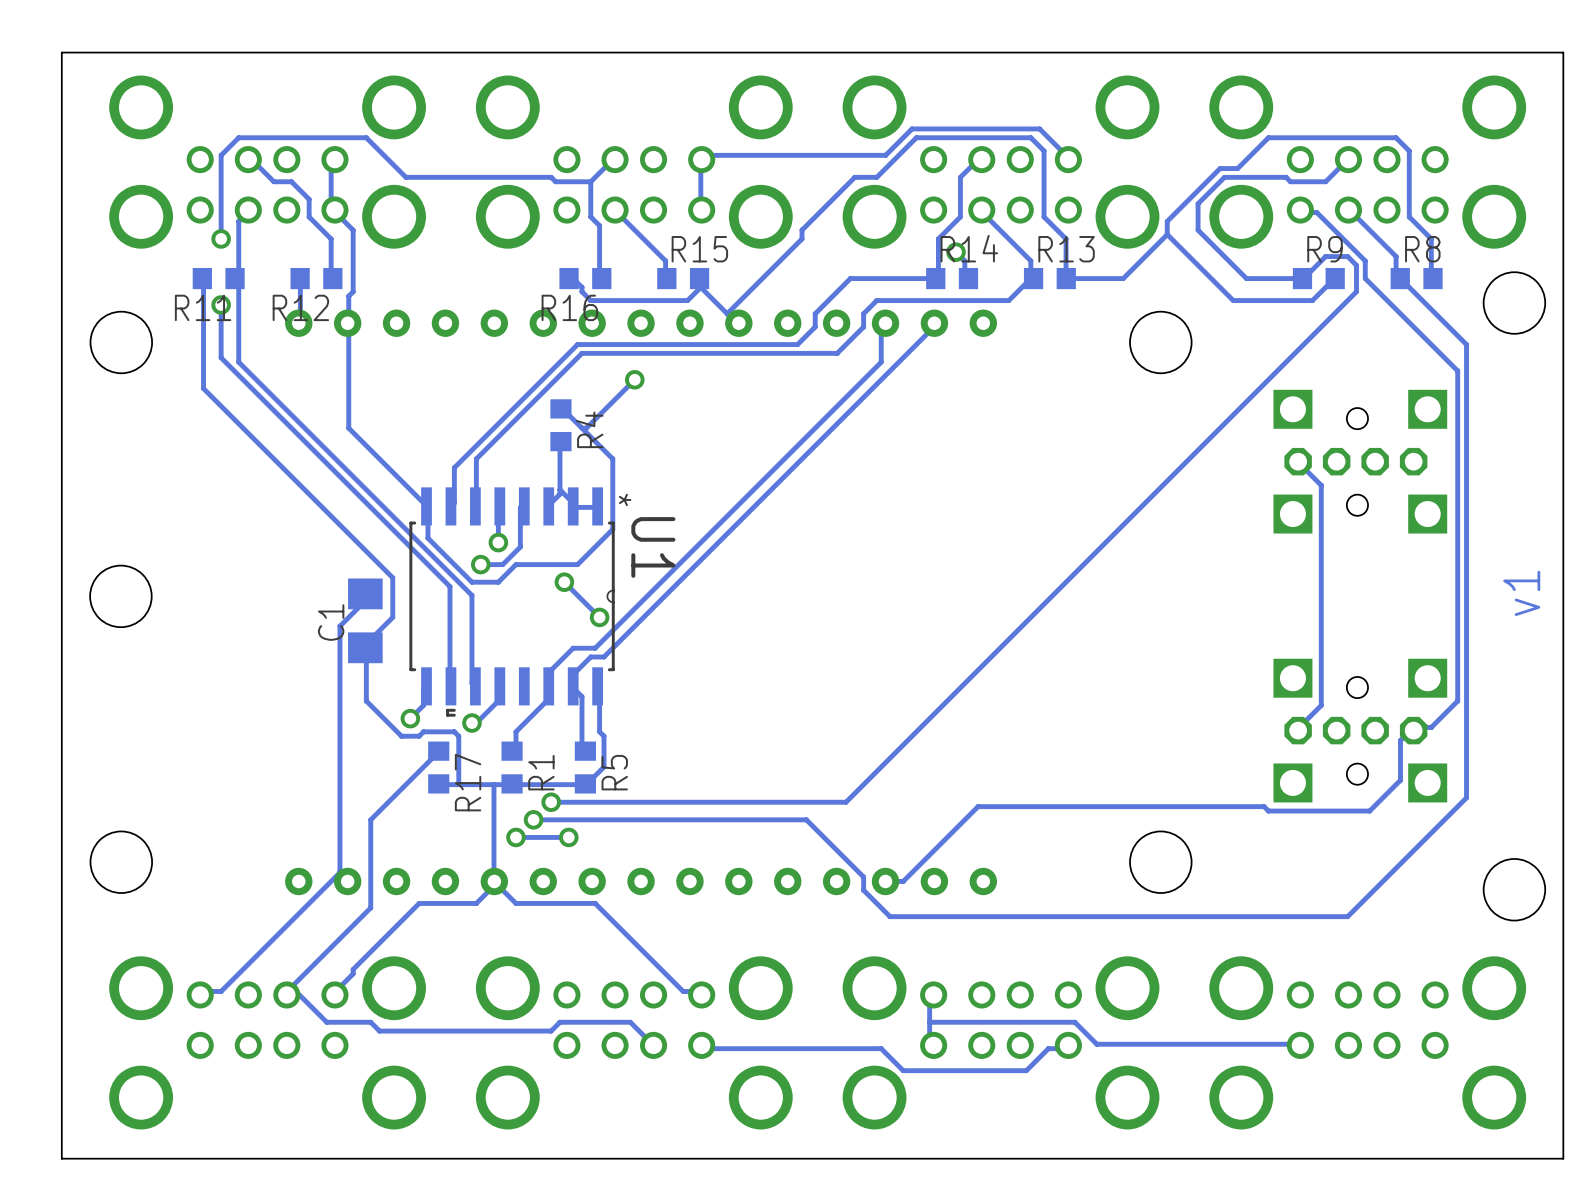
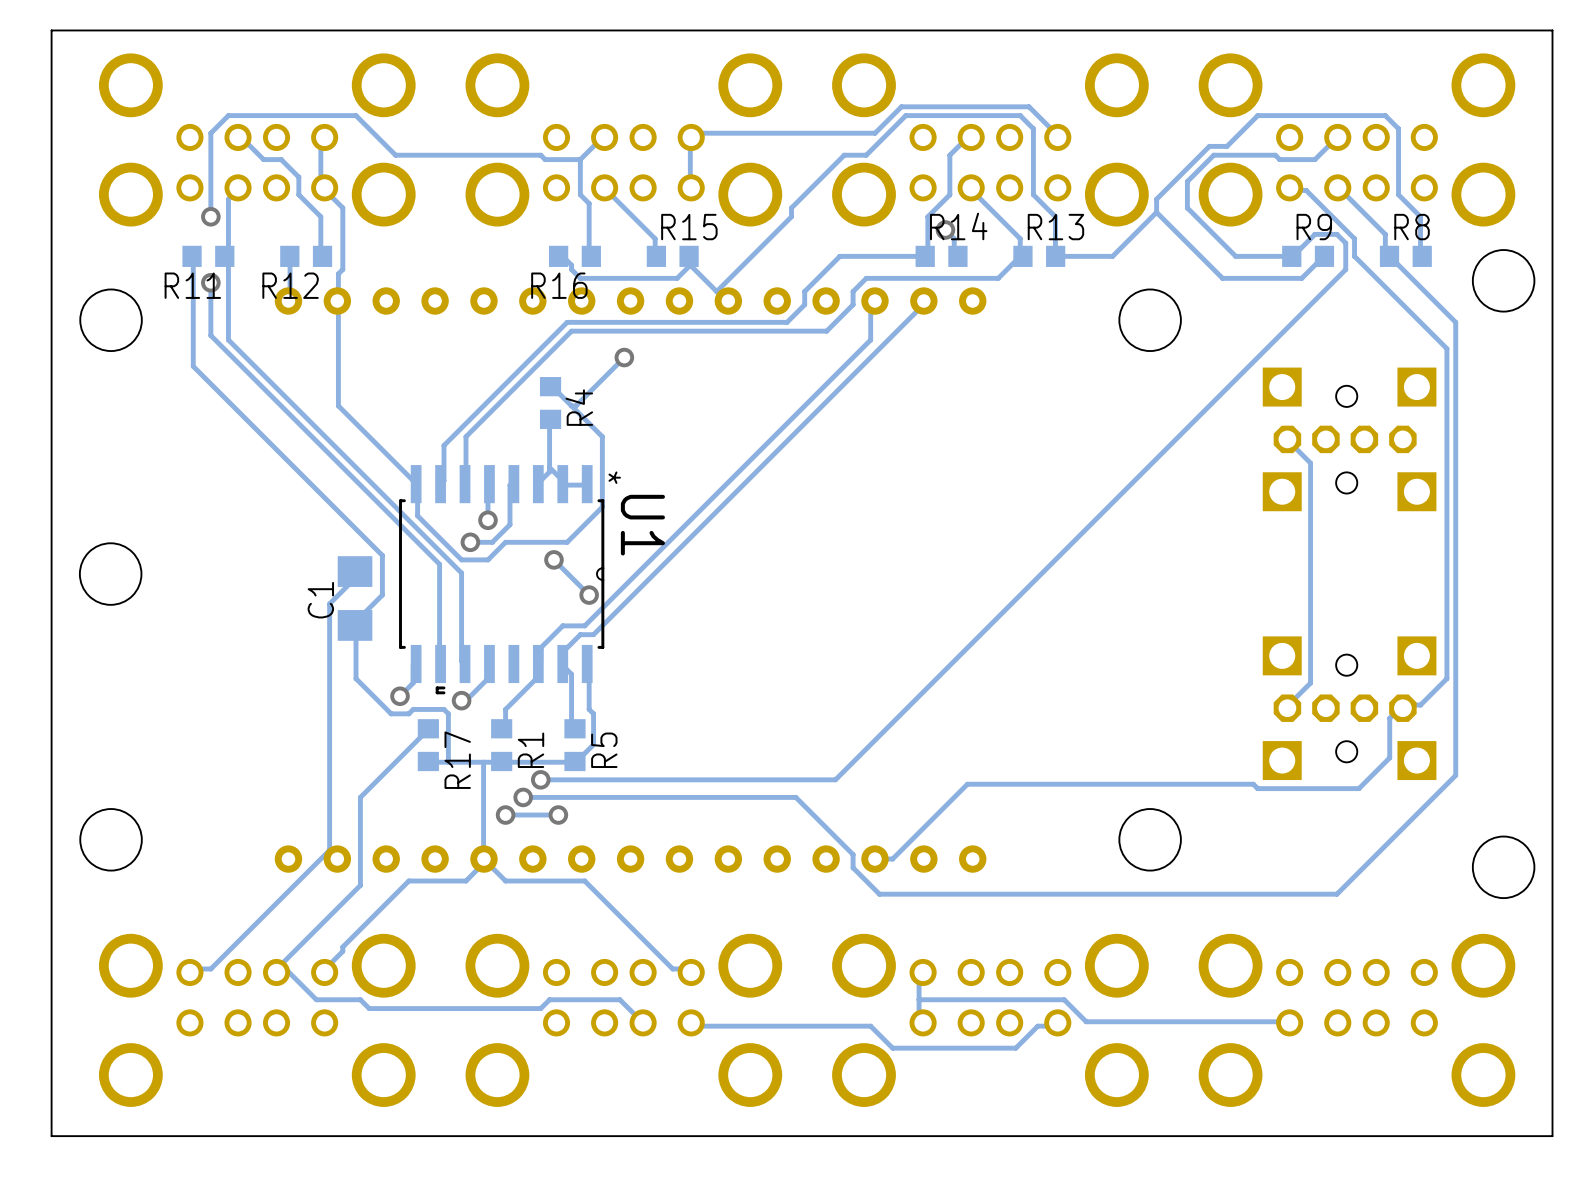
text: v1 (1521, 593) -> none

